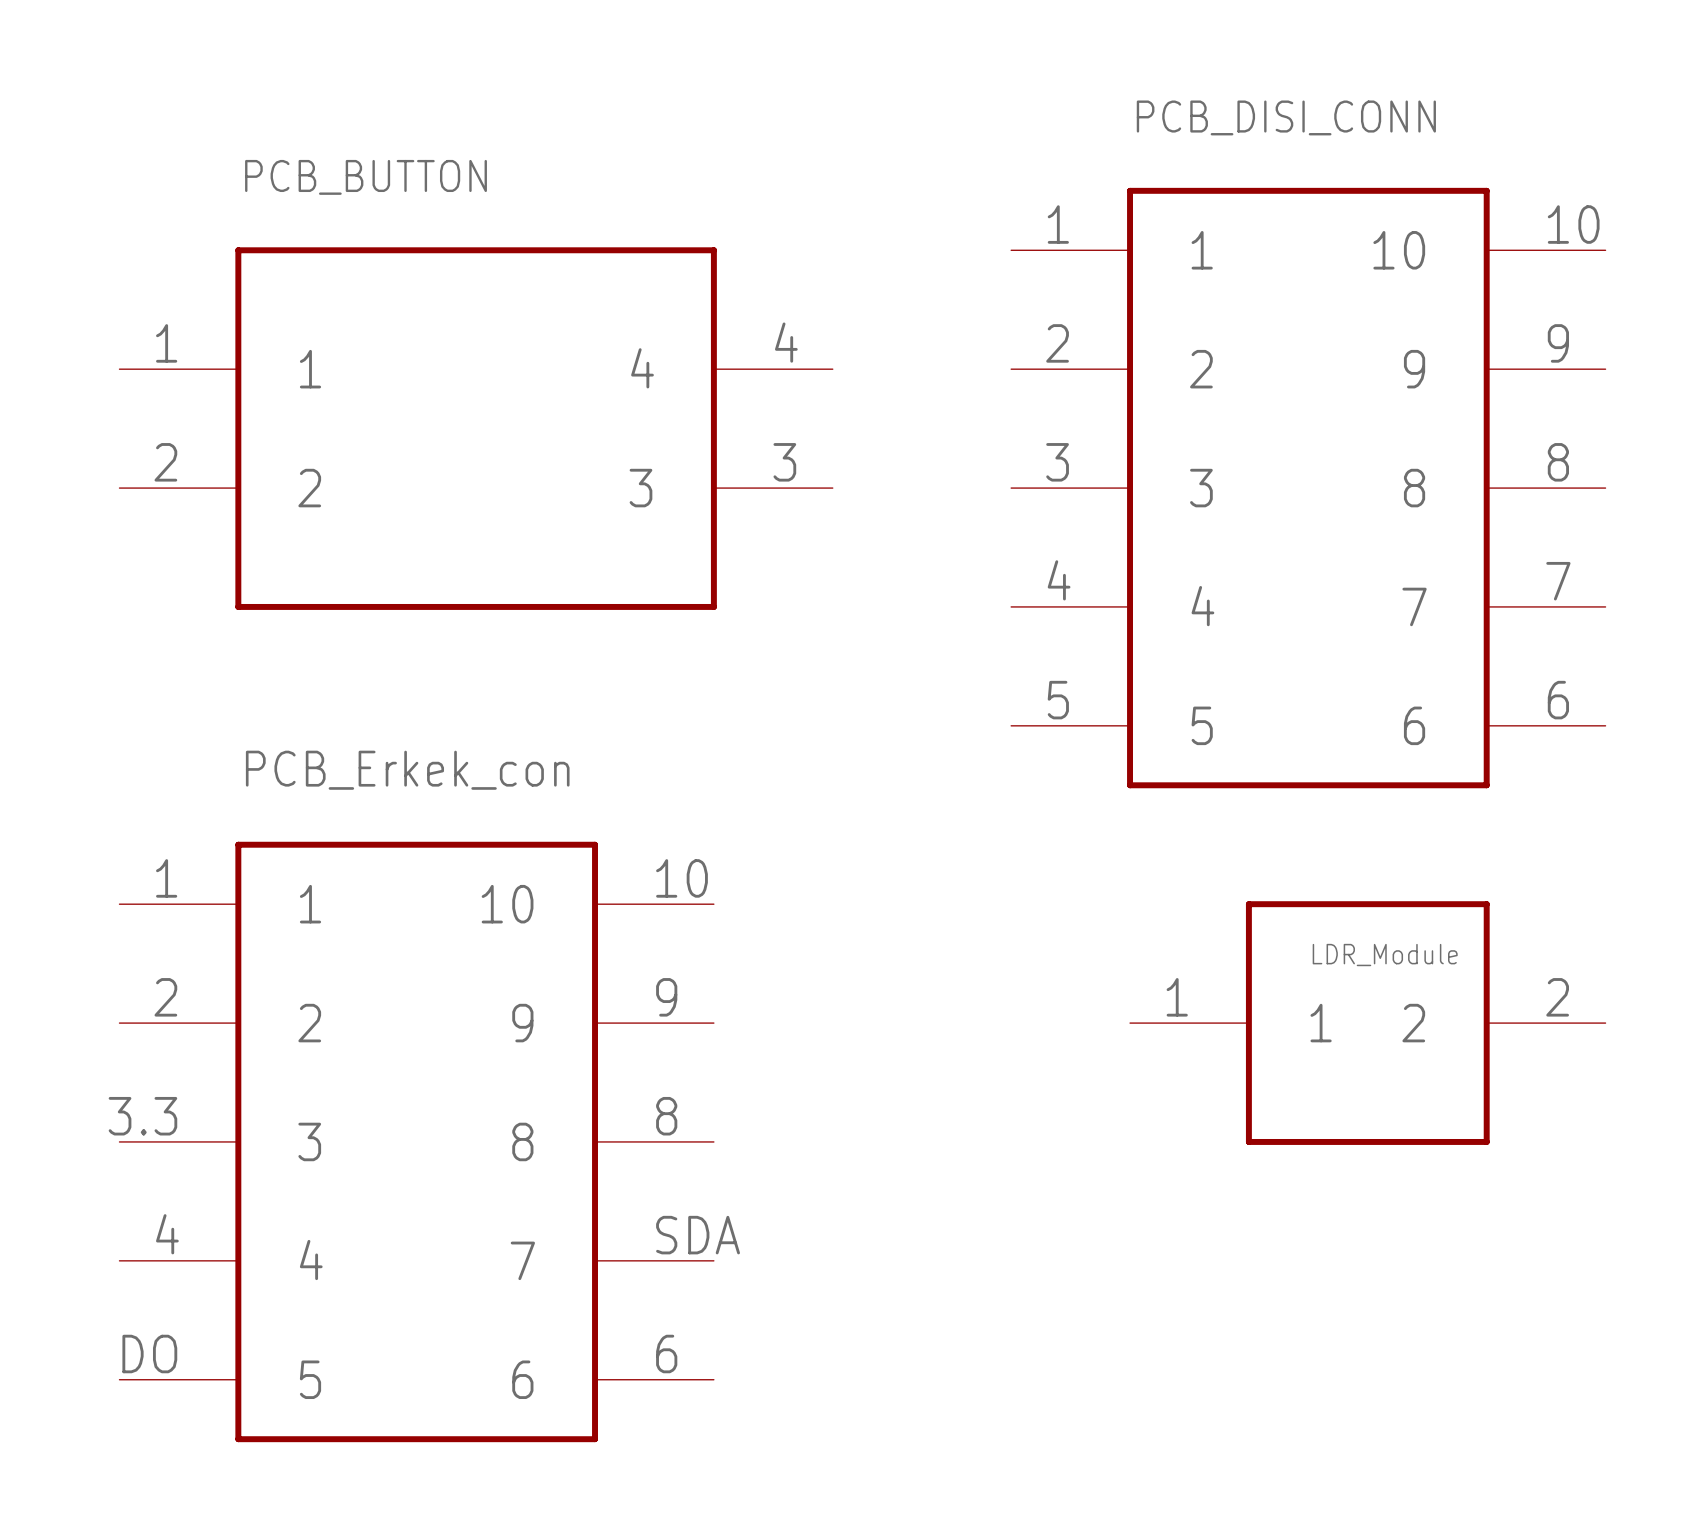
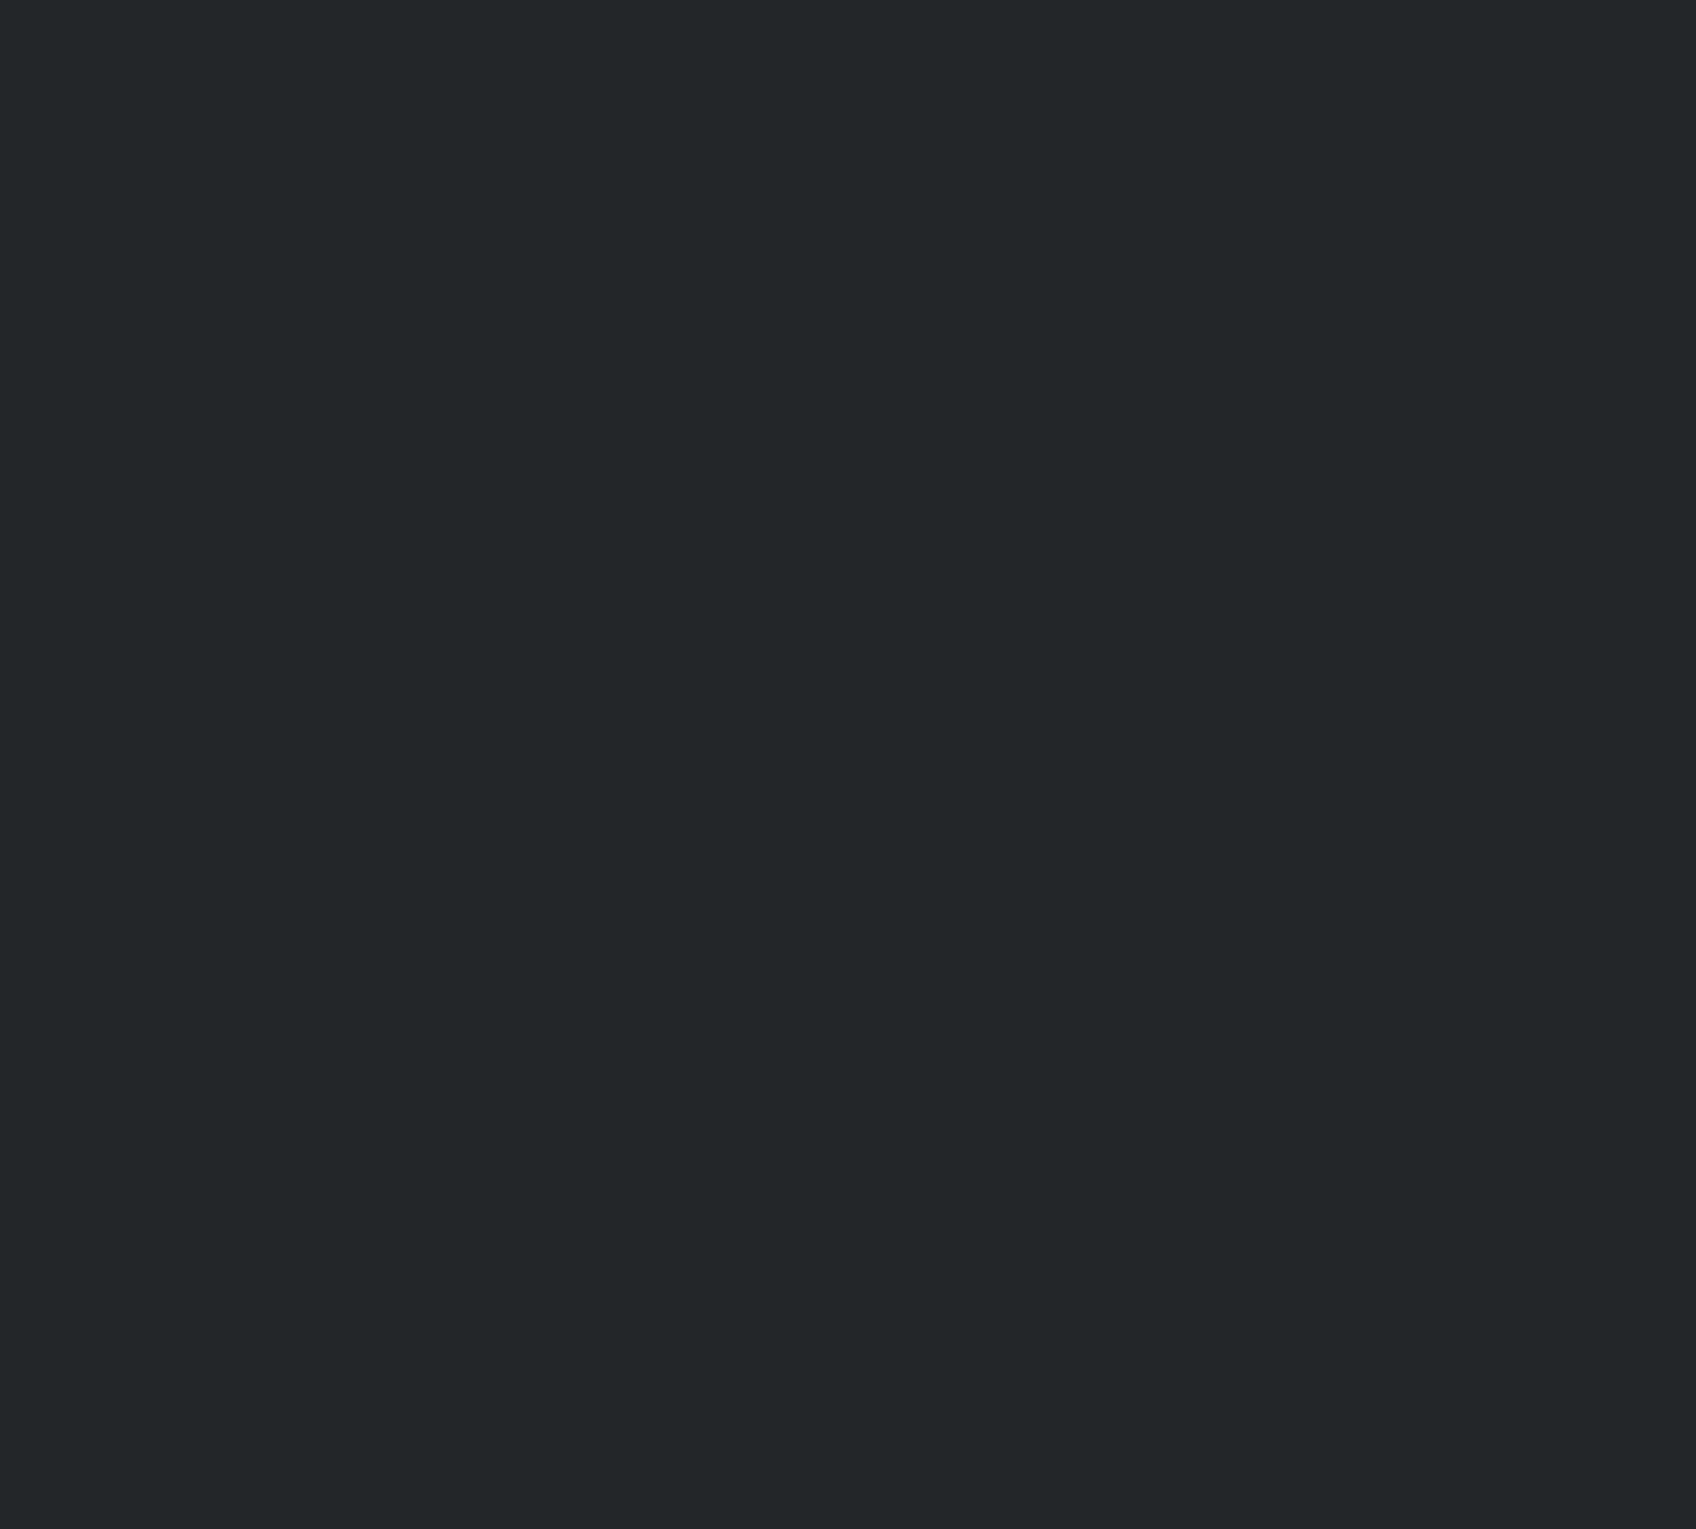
part: (476, 428) -> none
part: (1308, 488) -> none
part: (1367, 1023) -> none
part: (416, 1141) -> none

